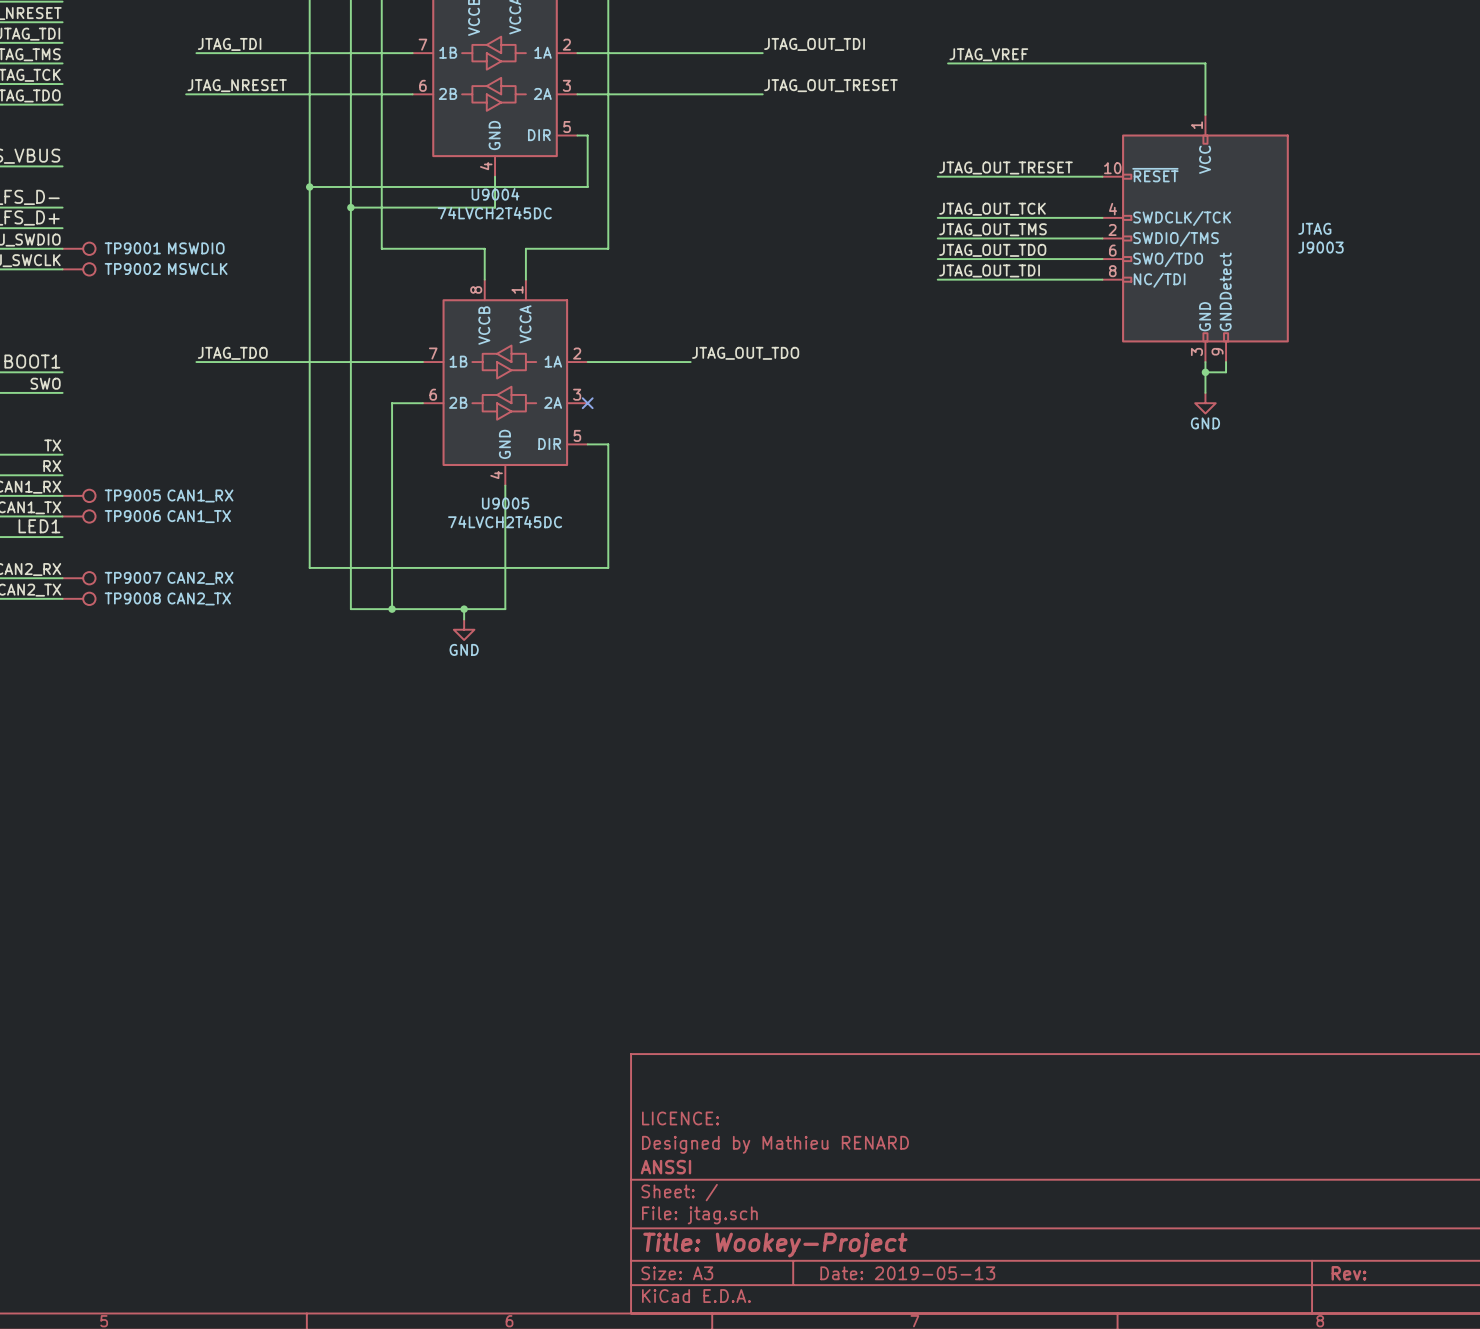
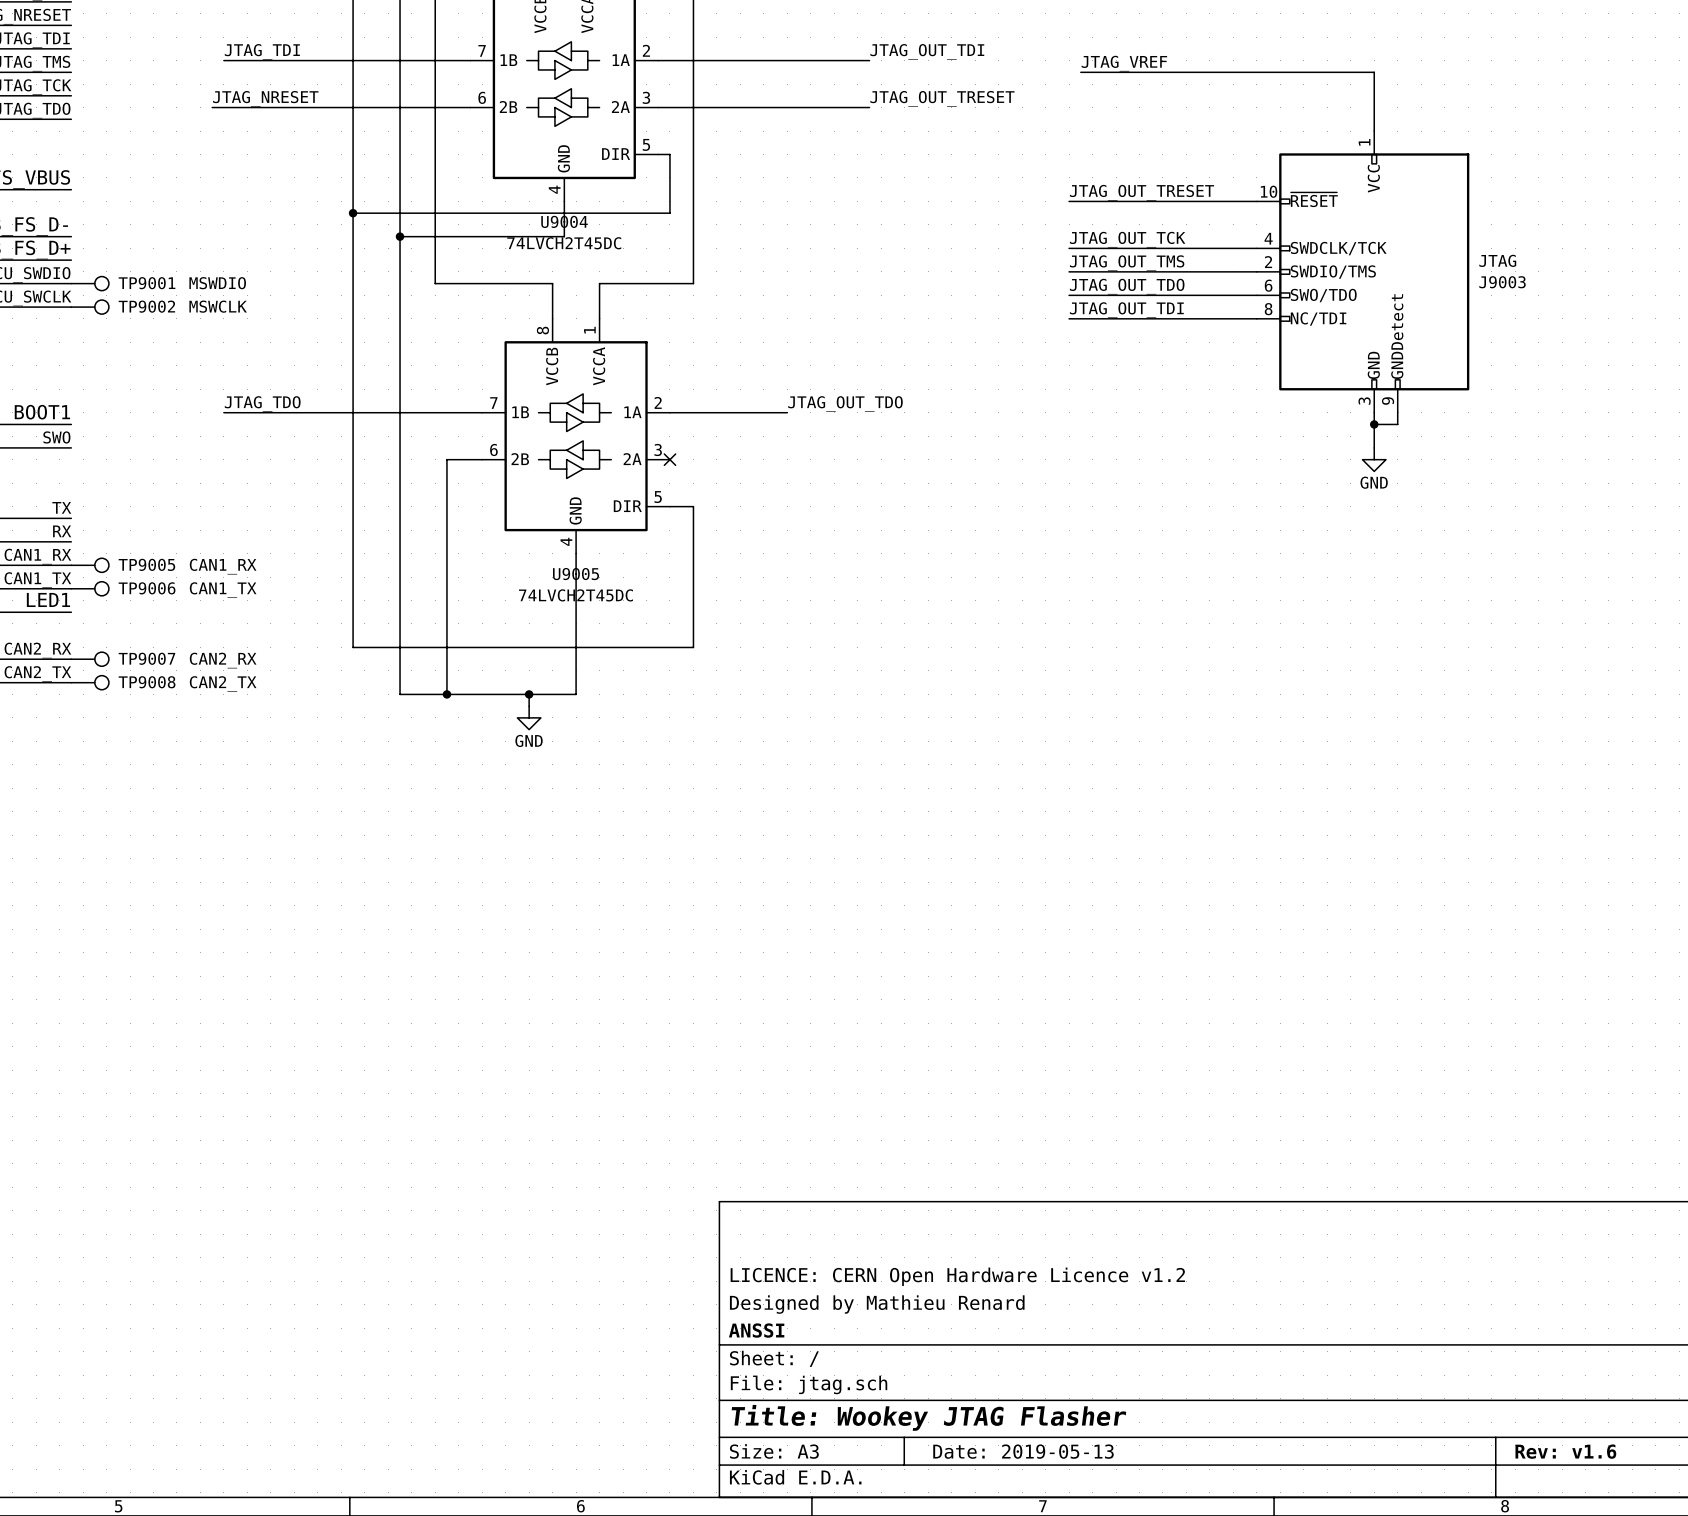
title block: LICENCE: (680, 1118) -> LICENCE: CERN Open Hardware Licence v1.2 (957, 1276)
title block: Designed by Mathieu RENARD (775, 1144) -> Designed by Mathieu Renard (877, 1304)
title block: Title: Wookey-Project (775, 1245) -> Title: Wookey JTAG Flasher (928, 1417)
title block: Rev: (1348, 1273) -> Rev: v1.6 (1565, 1451)

